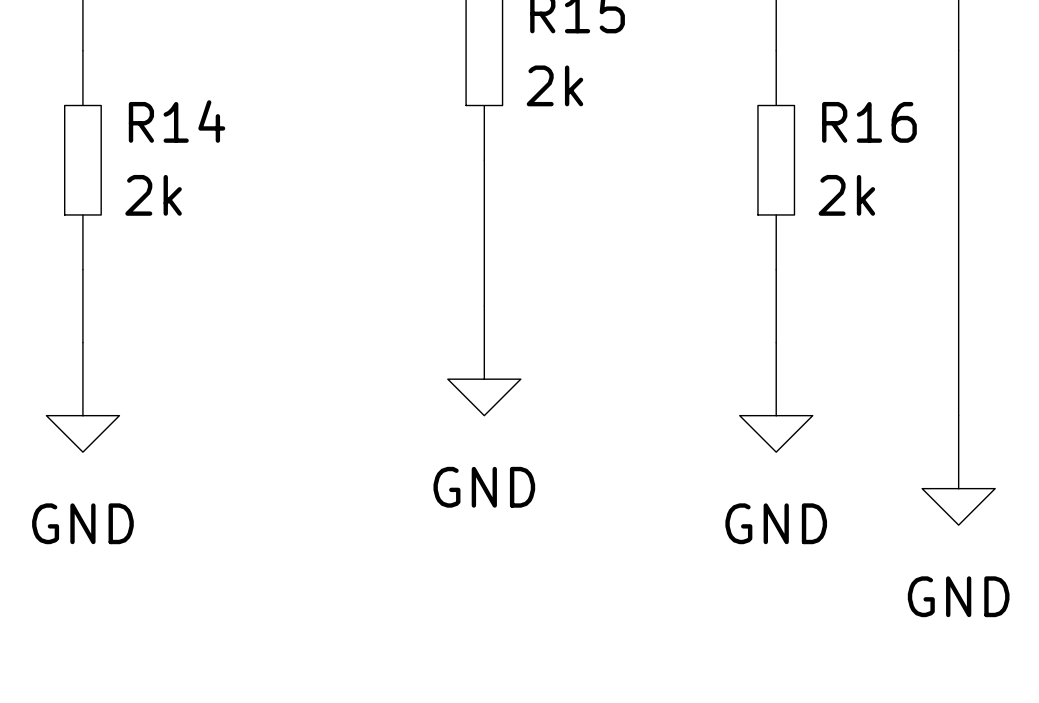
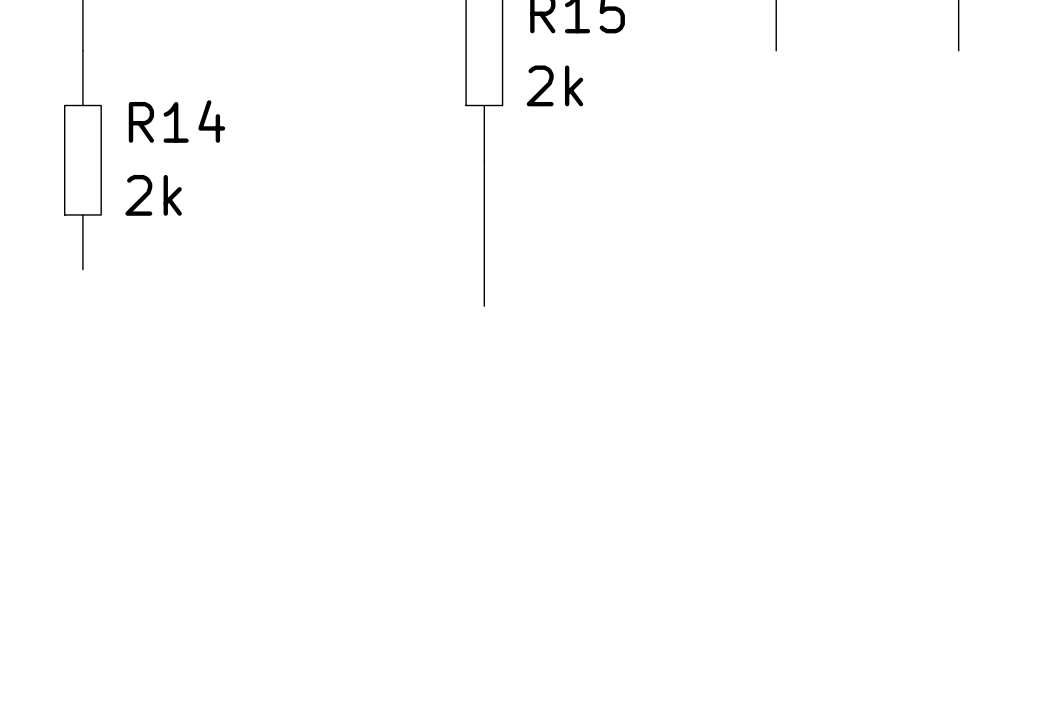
wire: (958, 50) (958, 415) -> none
R16: 2k (776, 160) -> none
wire: (82, 269) (82, 342) -> none
wire: (776, 269) (776, 342) -> none
power symbol: GND (484, 360) -> none
power symbol: GND (82, 397) -> none
power symbol: GND (776, 397) -> none
power symbol: GND (958, 470) -> none

